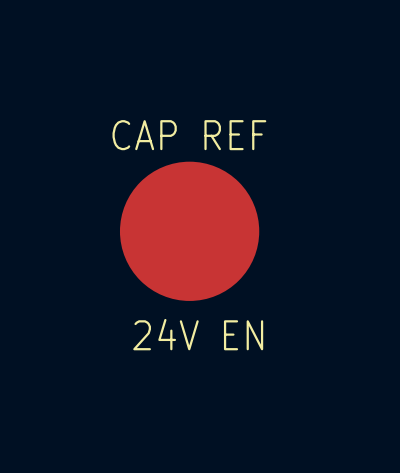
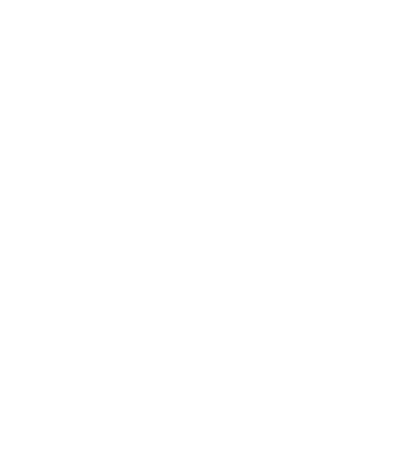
text: CAP REF (189, 135) -> none
part: (189, 231) -> none
text: 24V EN (198, 334) -> none

